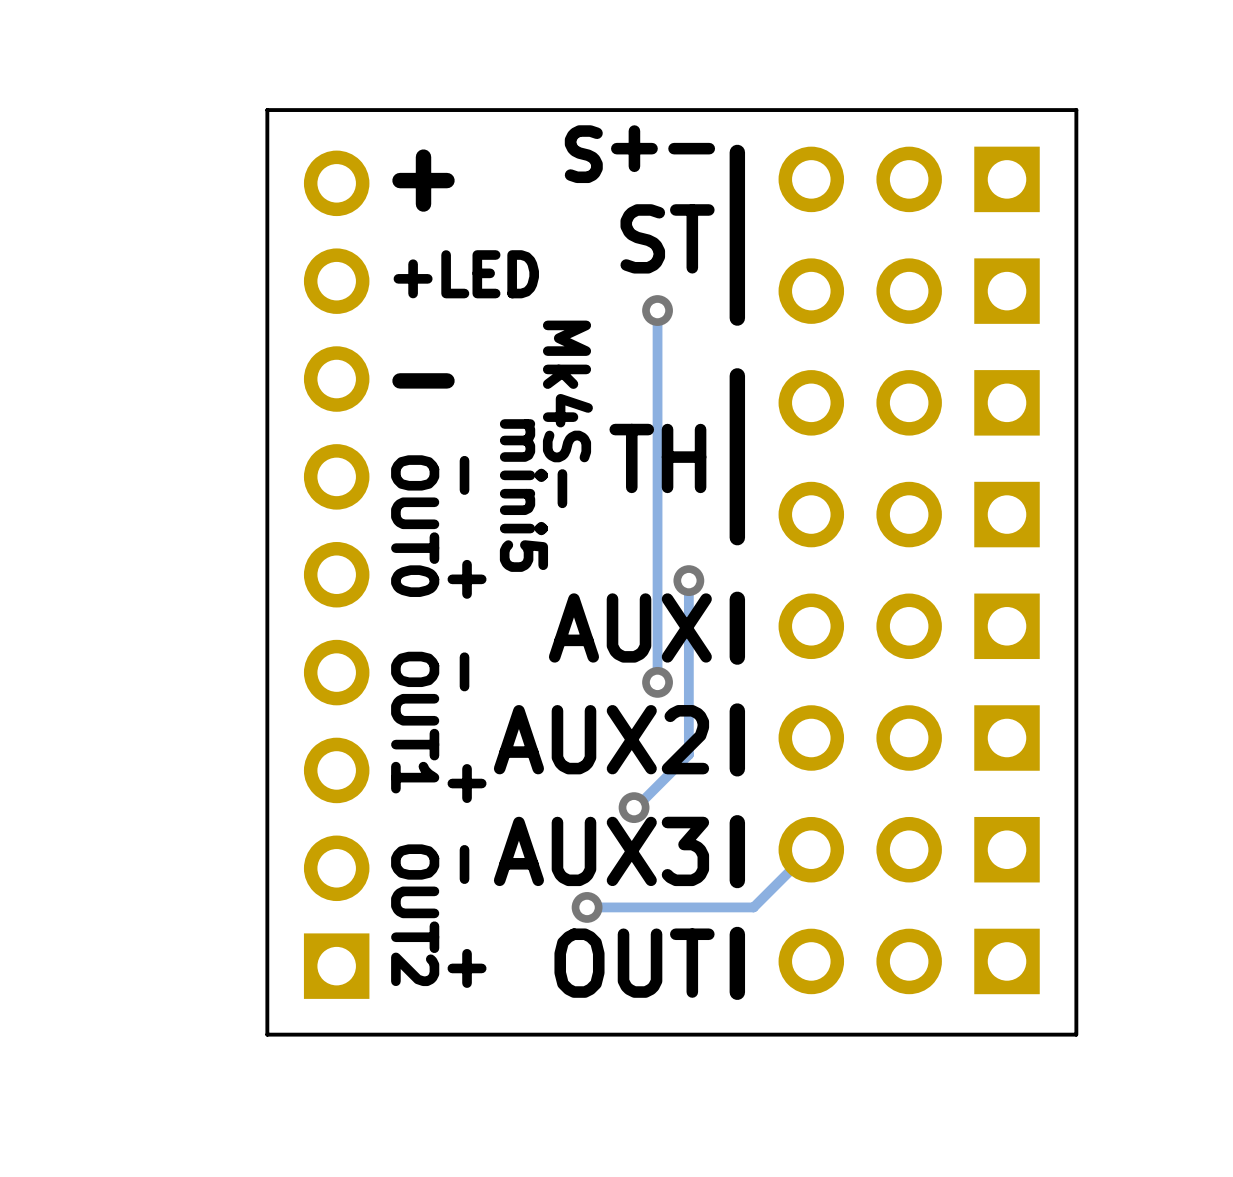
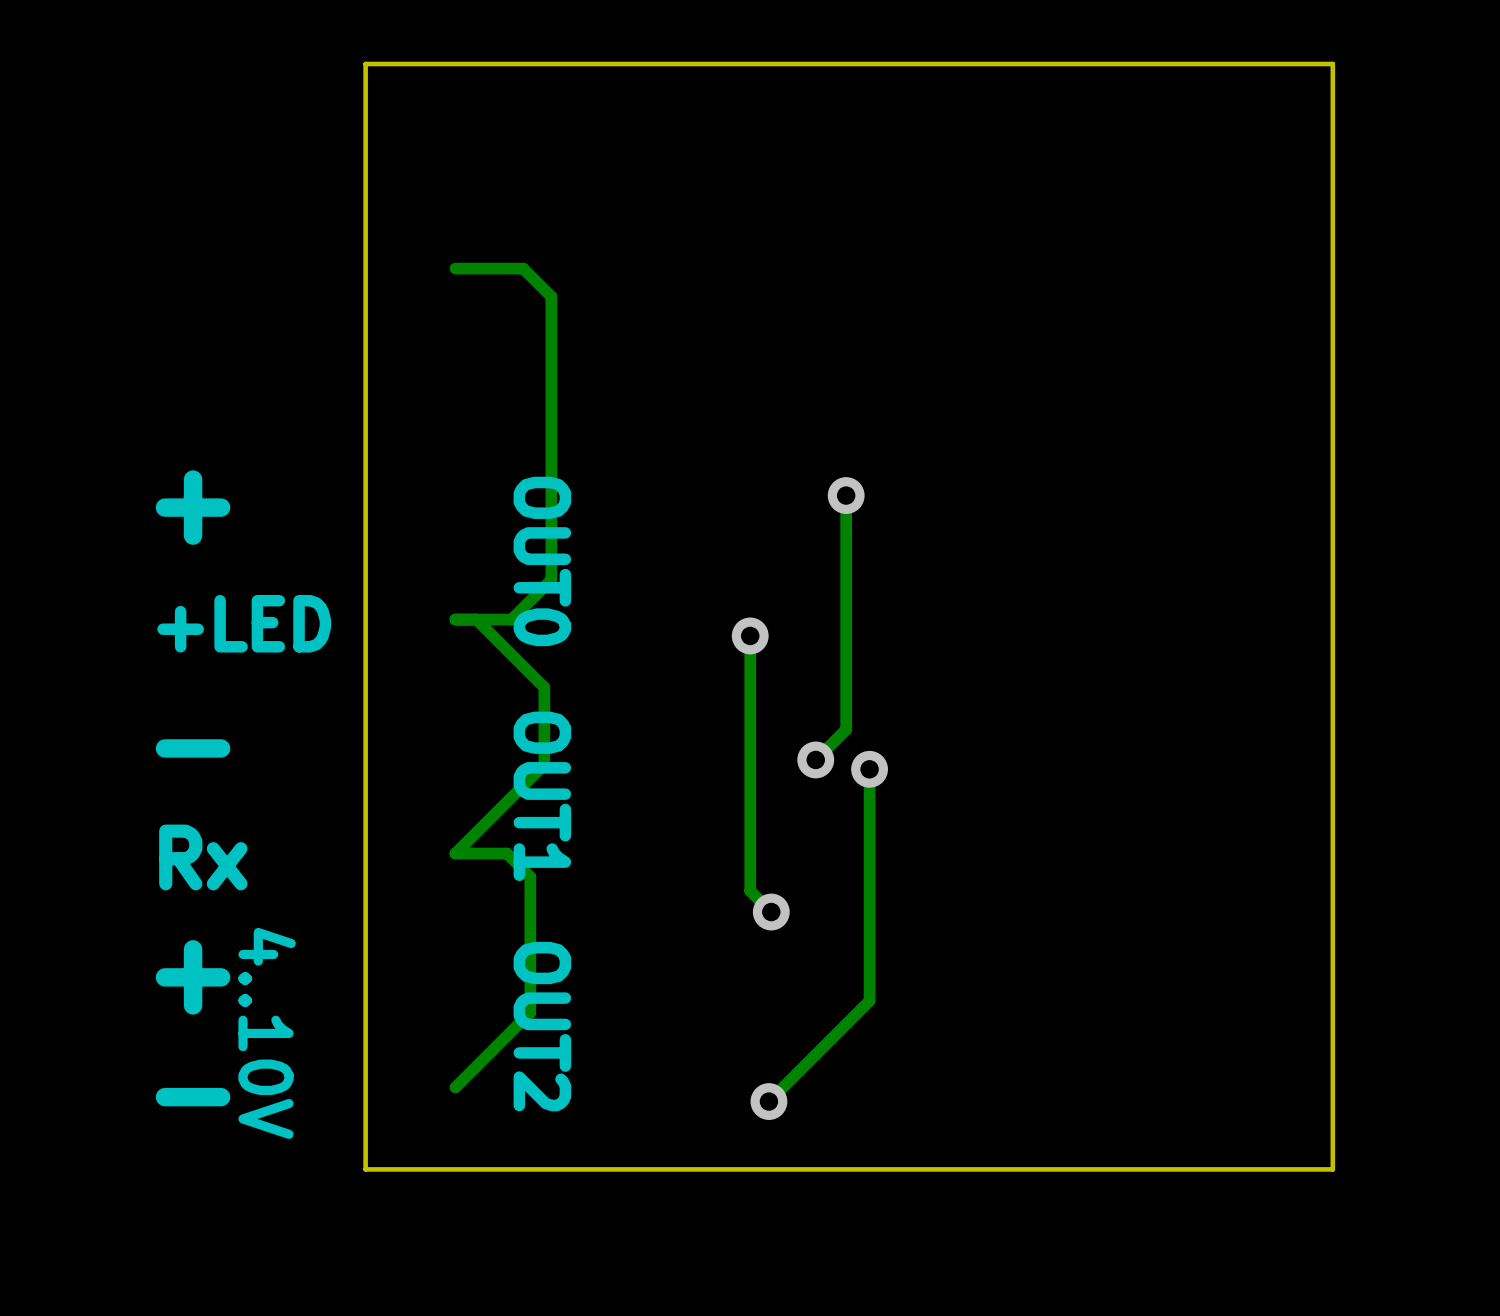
line: (737, 152) (737, 318) -> none
text: -+S (639, 154) -> none
part: (909, 179) -> none
text: + (423, 180) -> none
text: ST (667, 238) -> none
text position: +LED (466, 274) -> +LED (244, 623)
track: none -> (455, 268) (523, 268) (551, 296) (551, 579) (511, 619) (455, 619)
part: (909, 291) -> none
track: (657, 310) (657, 682) -> none
via: (657, 310) -> none
line: (737, 375) (737, 537) -> none
text: - (423, 380) -> none
part: (909, 402) -> none
text: Mk4S- (567, 414) -> none
text: TH (657, 458) -> none
track: none -> (846, 495) (846, 729) (815, 759)
via: none -> (846, 495)
text: - (464, 475) -> none
text: none -> + (193, 507)
text: mini5 (523, 495) -> none
part: (909, 514) -> none
part: (336, 574) -> none
track: none -> (476, 619) (544, 687) (544, 764) (455, 853) (506, 853) (530, 876) (530, 1012) (455, 1087)
text: + (467, 579) -> none
track: (688, 580) (688, 699) -> none
via: (688, 580) -> none
track: none -> (750, 635) (750, 890) (771, 912)
via: none -> (750, 635)
line: (737, 599) (737, 657) -> none
part: (909, 626) -> none
text: AUX (630, 627) -> none
text: - (464, 671) -> none
text: none -> - (193, 748)
via position: (657, 682) -> (815, 759)
via: none -> (869, 769)
line: (737, 711) (737, 768) -> none
part: (909, 738) -> none
text: AUX2 (601, 739) -> none
track: (688, 754) (634, 807) -> (869, 834) (869, 1000) (768, 1101)
text: none -> Rx (203, 857)
text: + (467, 783) -> none
via position: (634, 807) -> (771, 912)
line: (737, 822) (737, 880) -> none
track: (811, 849) (753, 907) (587, 907) -> none
part: (909, 849) -> none
text: AUX3 (601, 851) -> none
text: - (464, 864) -> none
text: none -> + (193, 977)
via: (587, 907) -> none
text: none -> 4..10V (267, 1033)
line: (737, 934) (737, 992) -> none
part: (909, 961) -> none
text: OUT (634, 963) -> none
text: + (467, 968) -> none
text: none -> - (193, 1097)
via: none -> (768, 1101)

